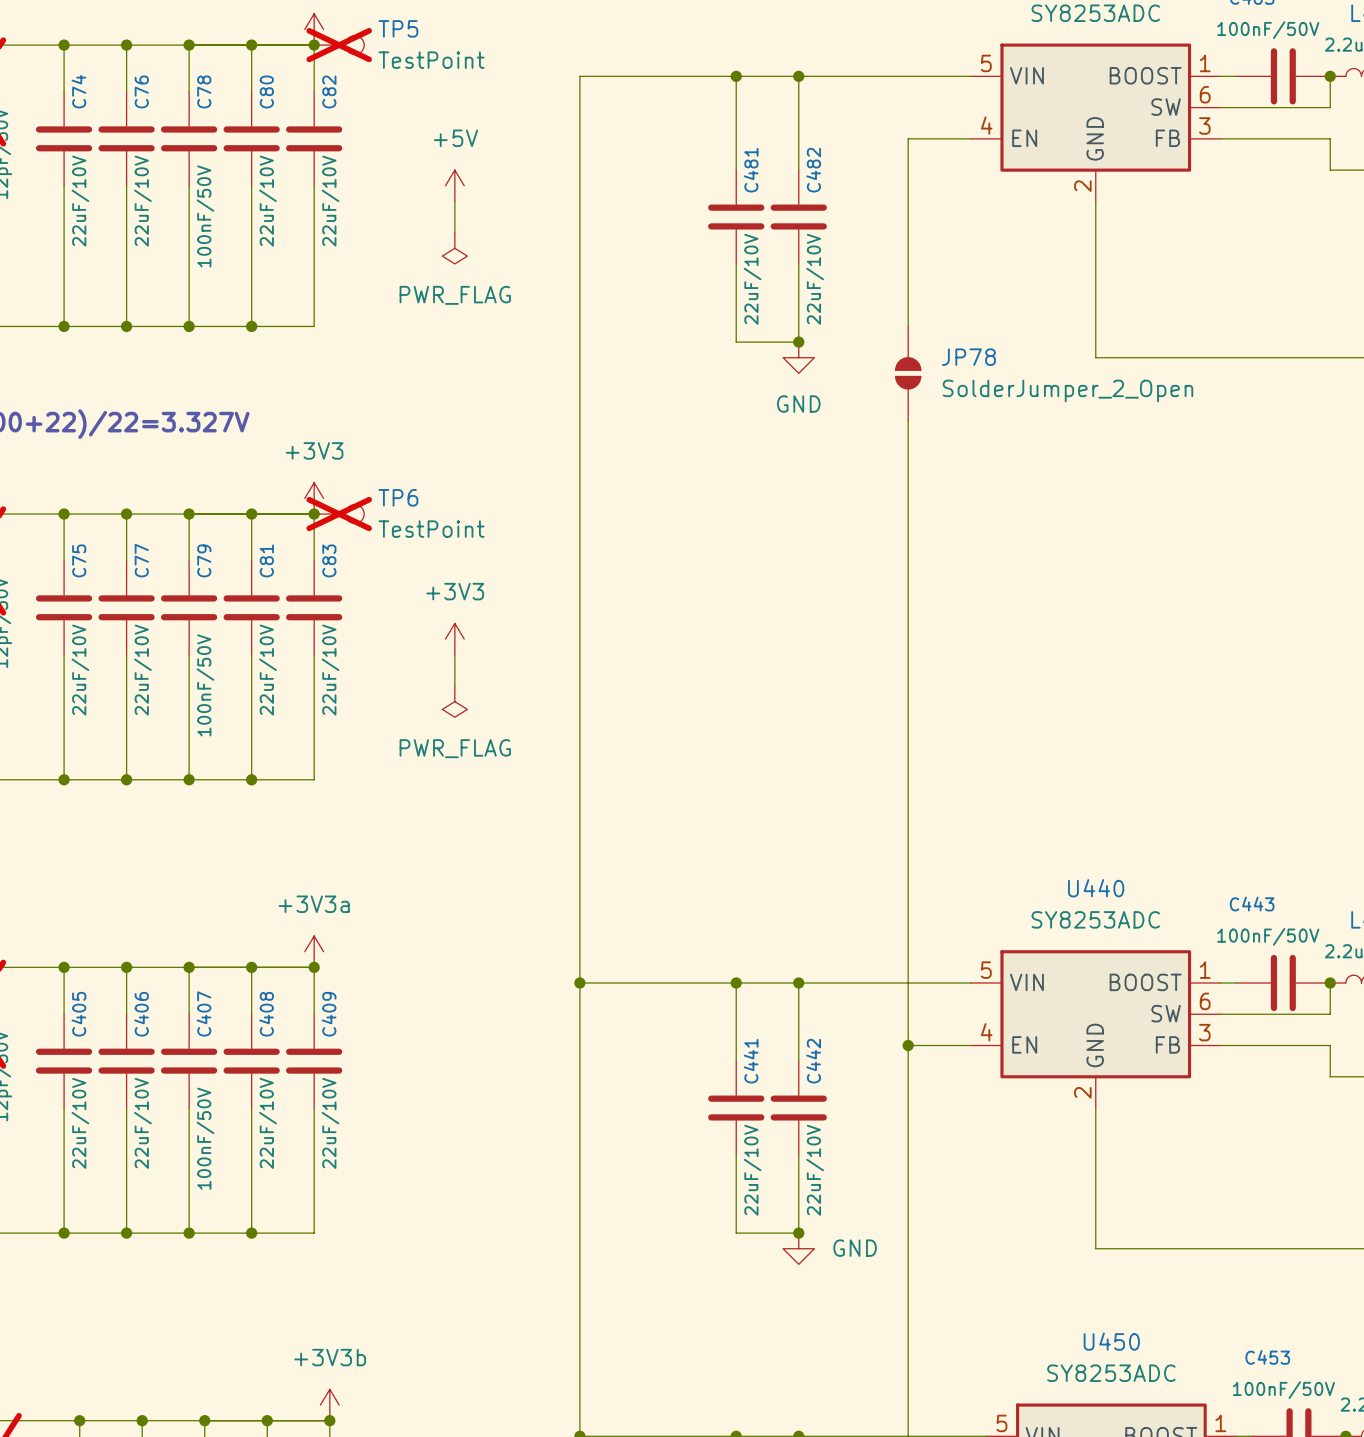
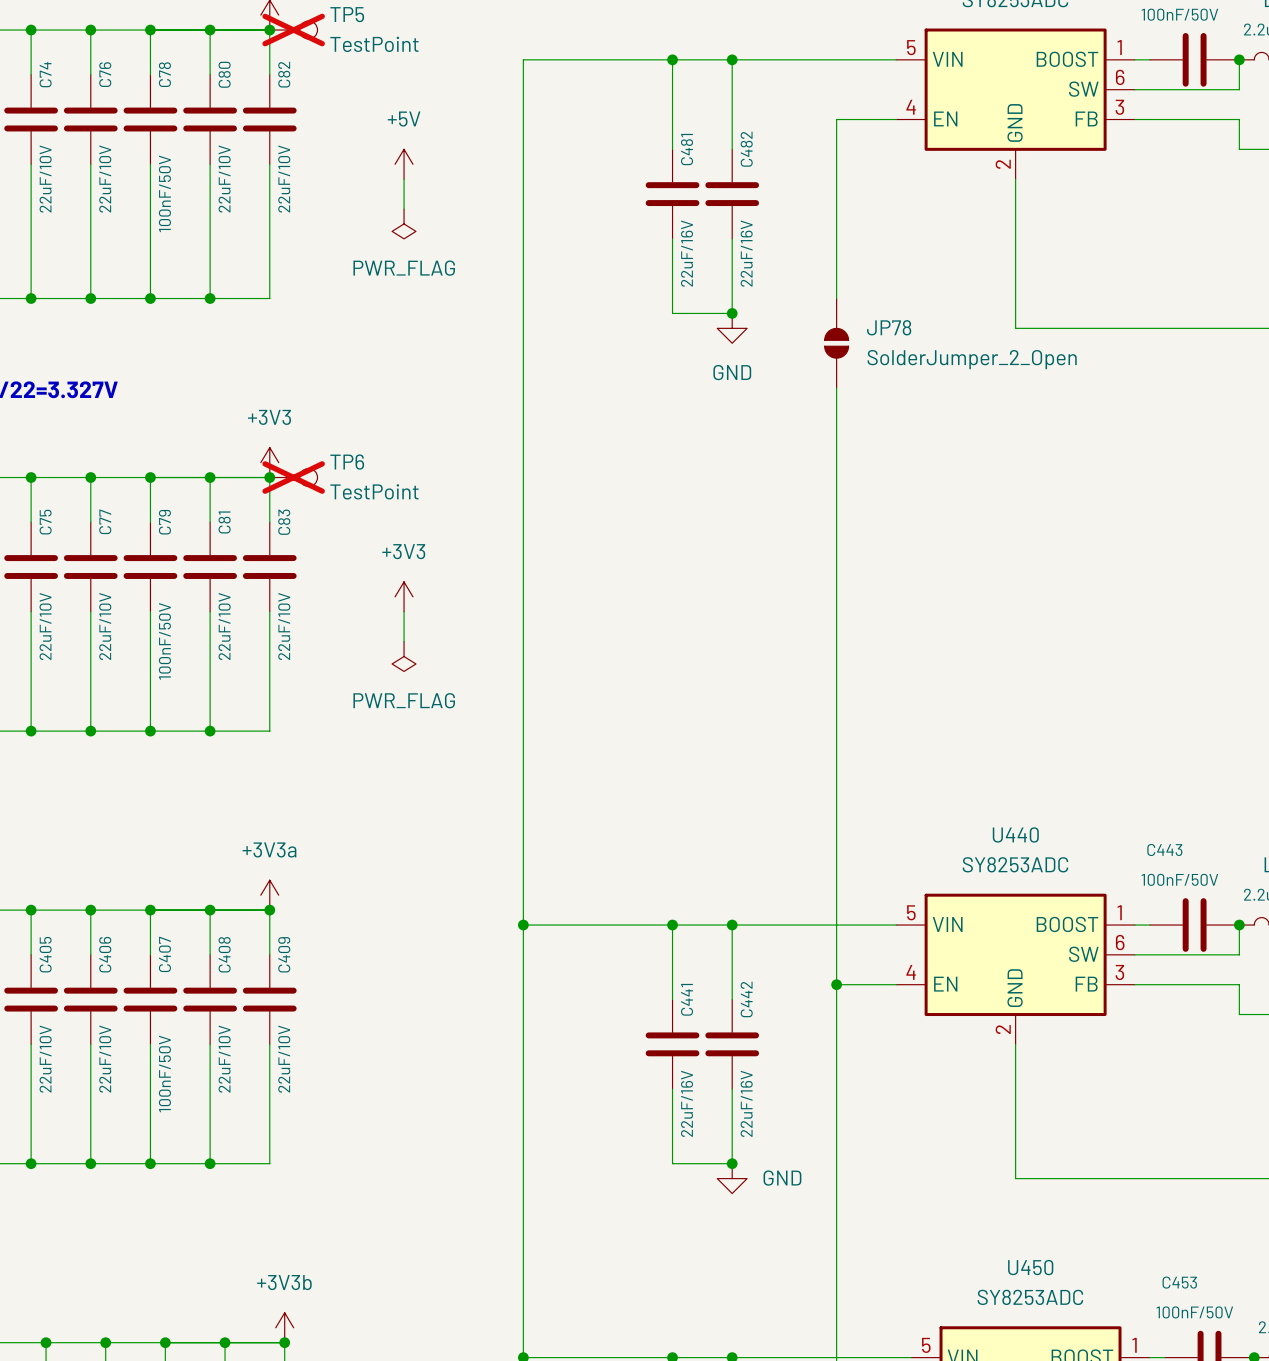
C481 value: 22uF/10V (752, 279) -> 22uF/16V (687, 253)
C482 value: 22uF/10V (815, 279) -> 22uF/16V (746, 253)
C441 value: 22uF/10V (752, 1170) -> 22uF/16V (687, 1103)
C442 value: 22uF/10V (815, 1170) -> 22uF/16V (746, 1103)

